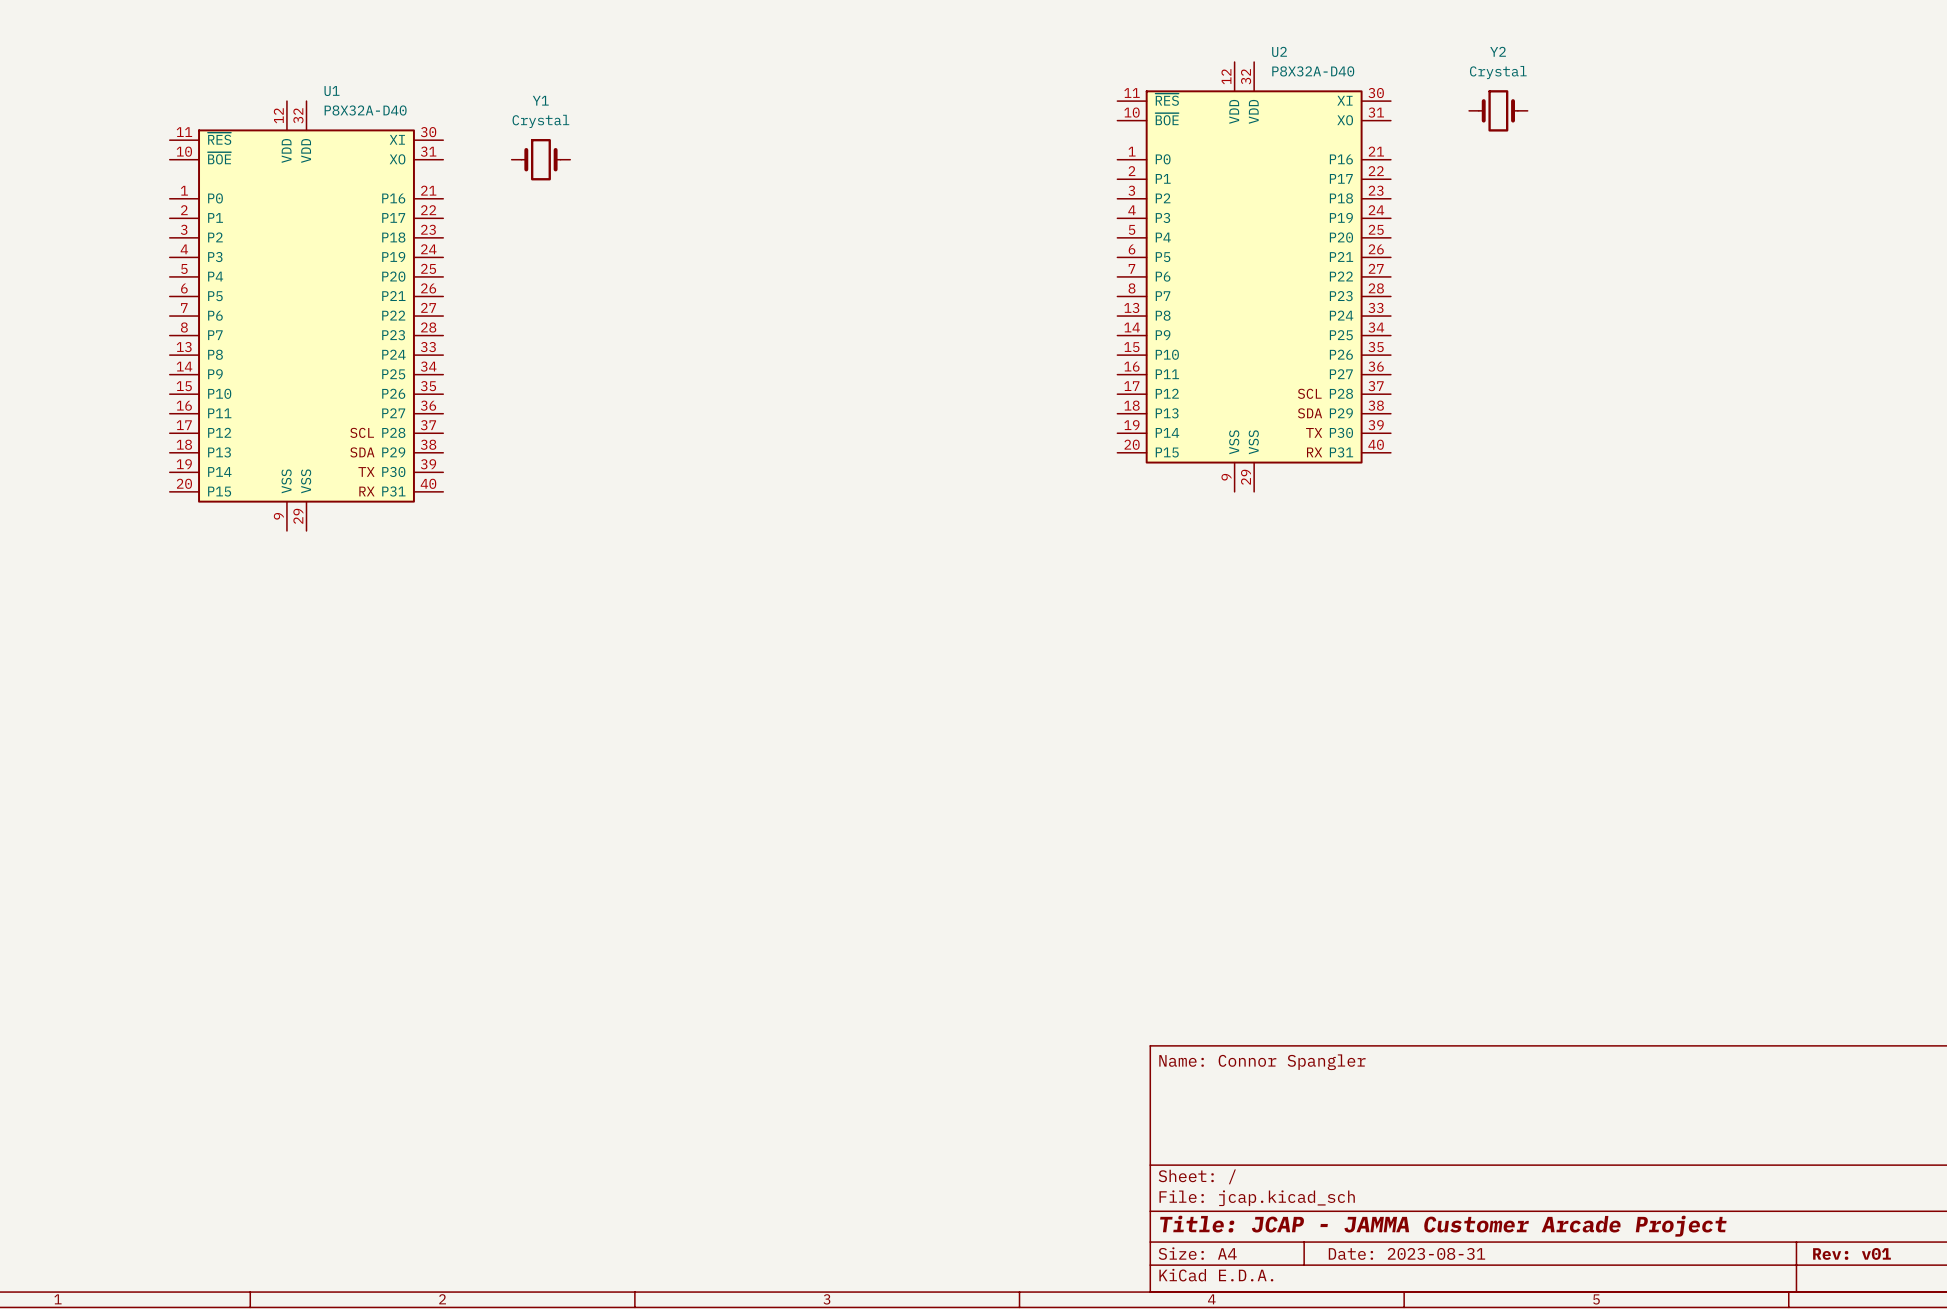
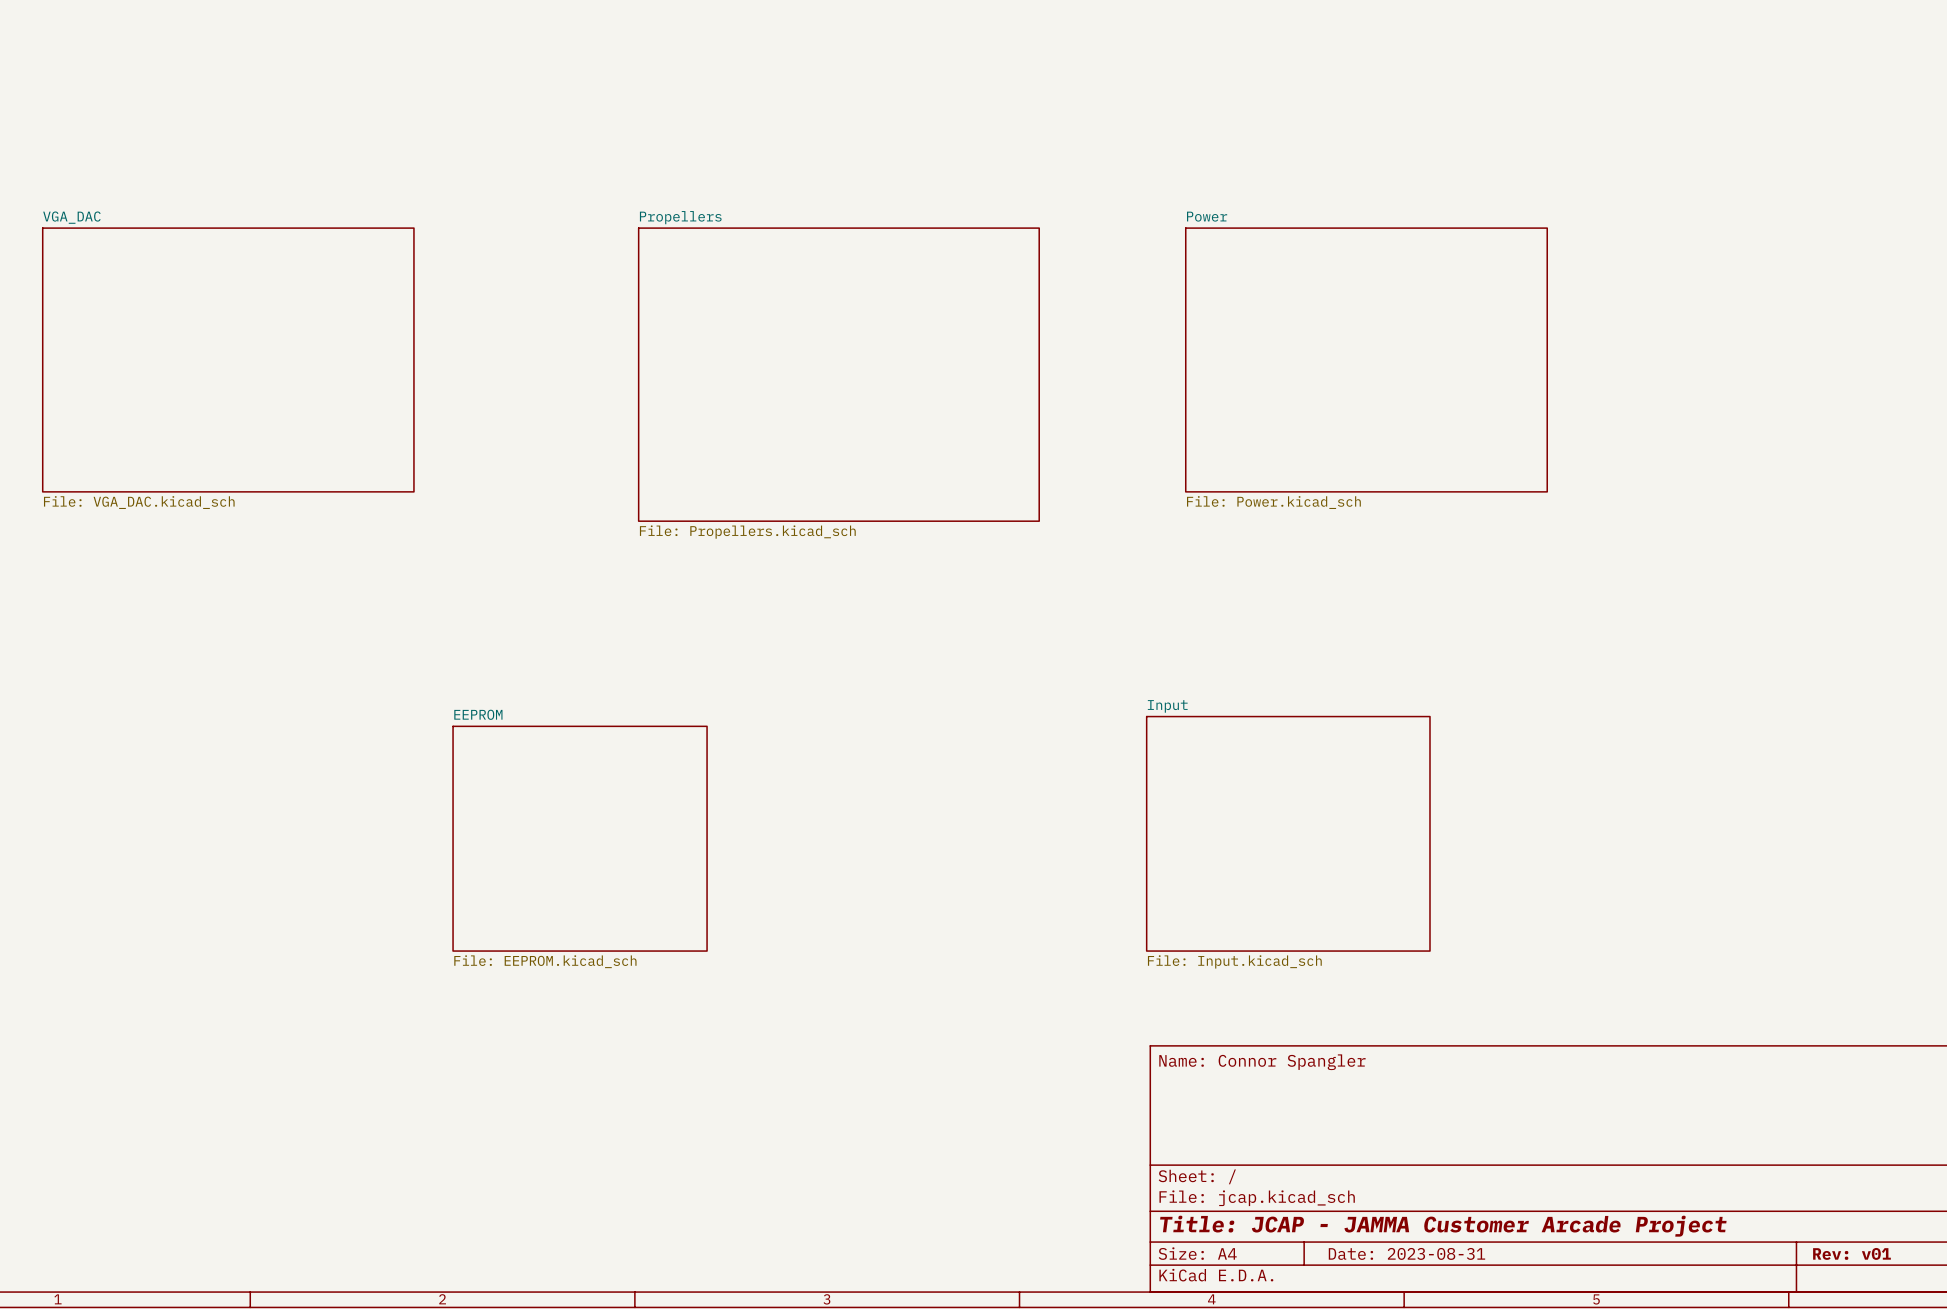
Y2: Crystal (1498, 110) -> none
Y1: Crystal (540, 159) -> none
U2: P8X32A-D40 (1254, 276) -> none
U1: P8X32A-D40 (306, 316) -> none
sheet VGA_DAC: none -> File: VGA_DAC.kicad_sch (228, 359)
sheet Power: none -> File: Power.kicad_sch (1366, 359)
sheet Propellers: none -> File: Propellers.kicad_sch (838, 374)
sheet Input: none -> File: Input.kicad_sch (1288, 833)
sheet EEPROM: none -> File: EEPROM.kicad_sch (580, 838)

